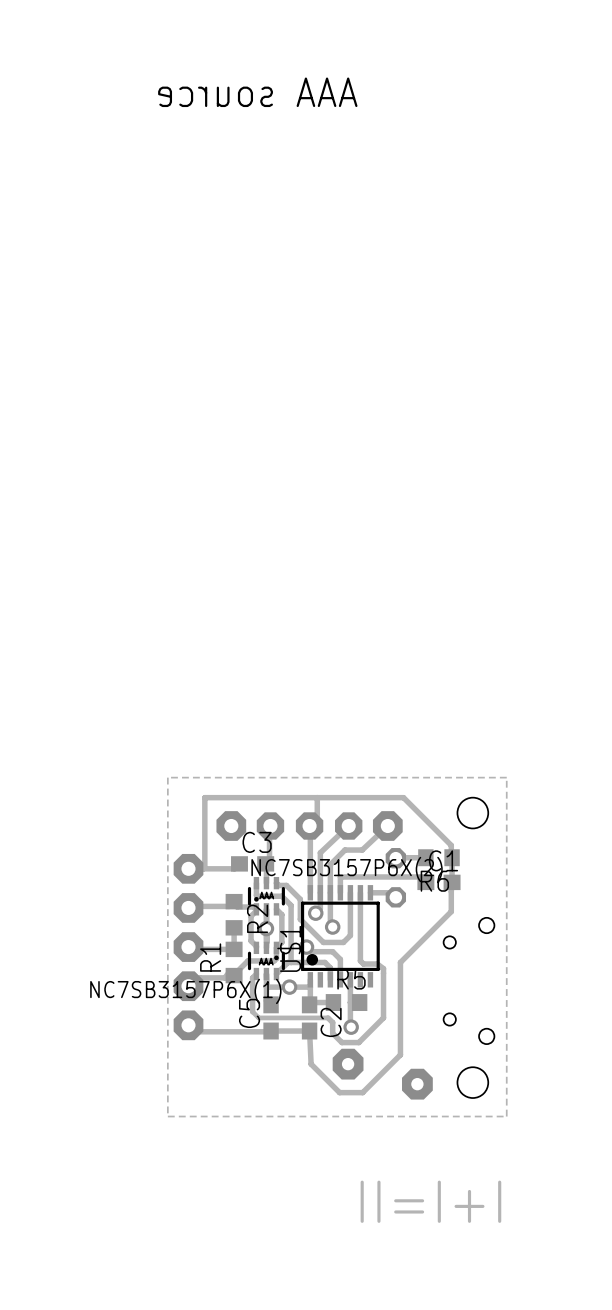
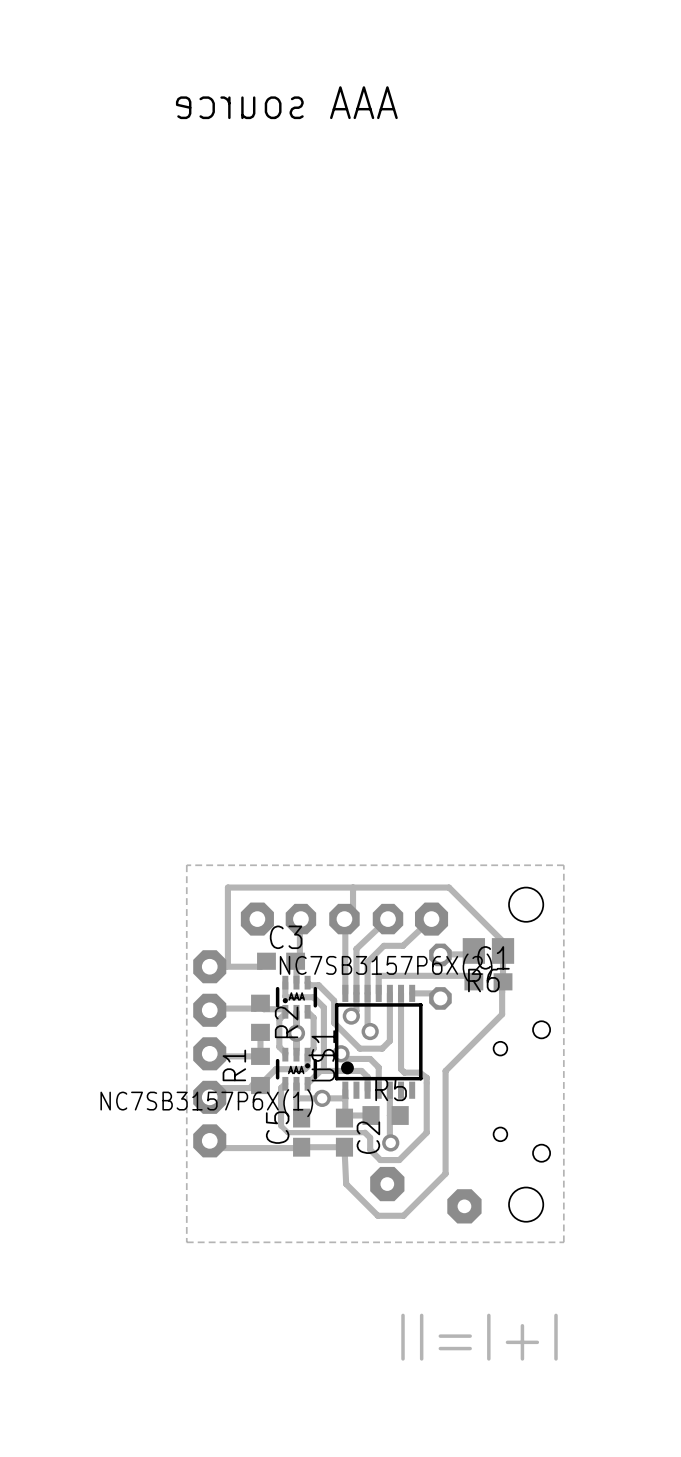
R6 footprint: [418, 849, 460, 867] -> [462, 938, 515, 964]

